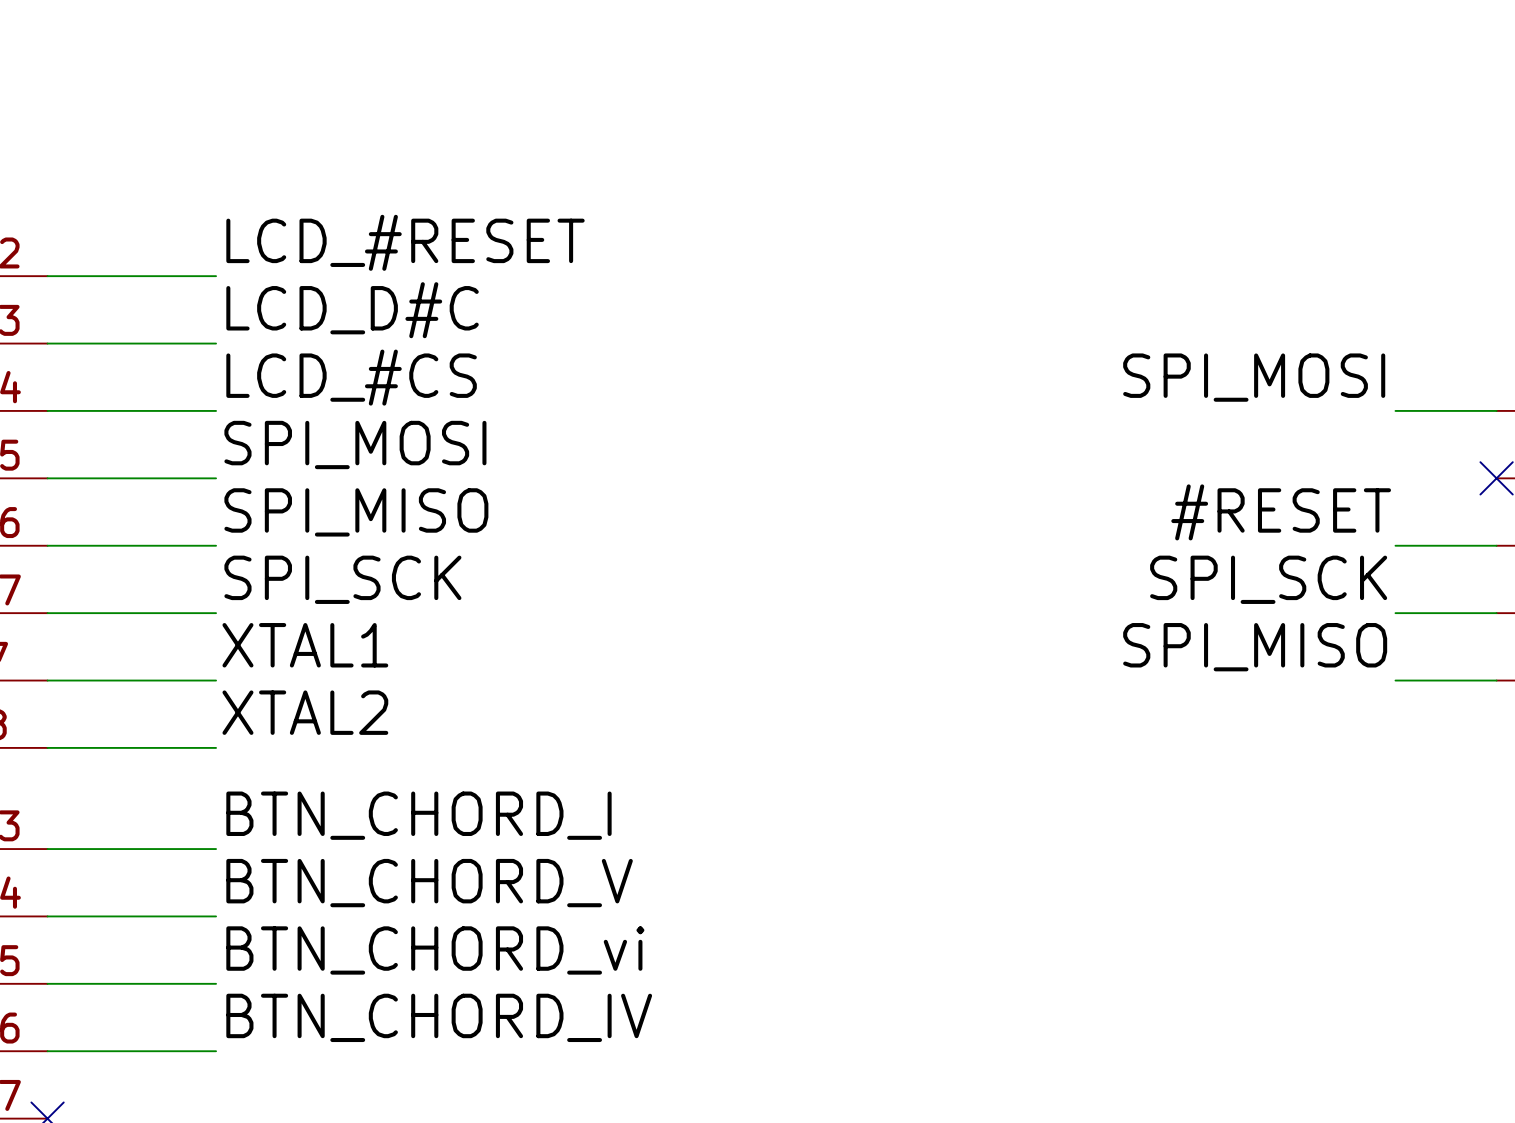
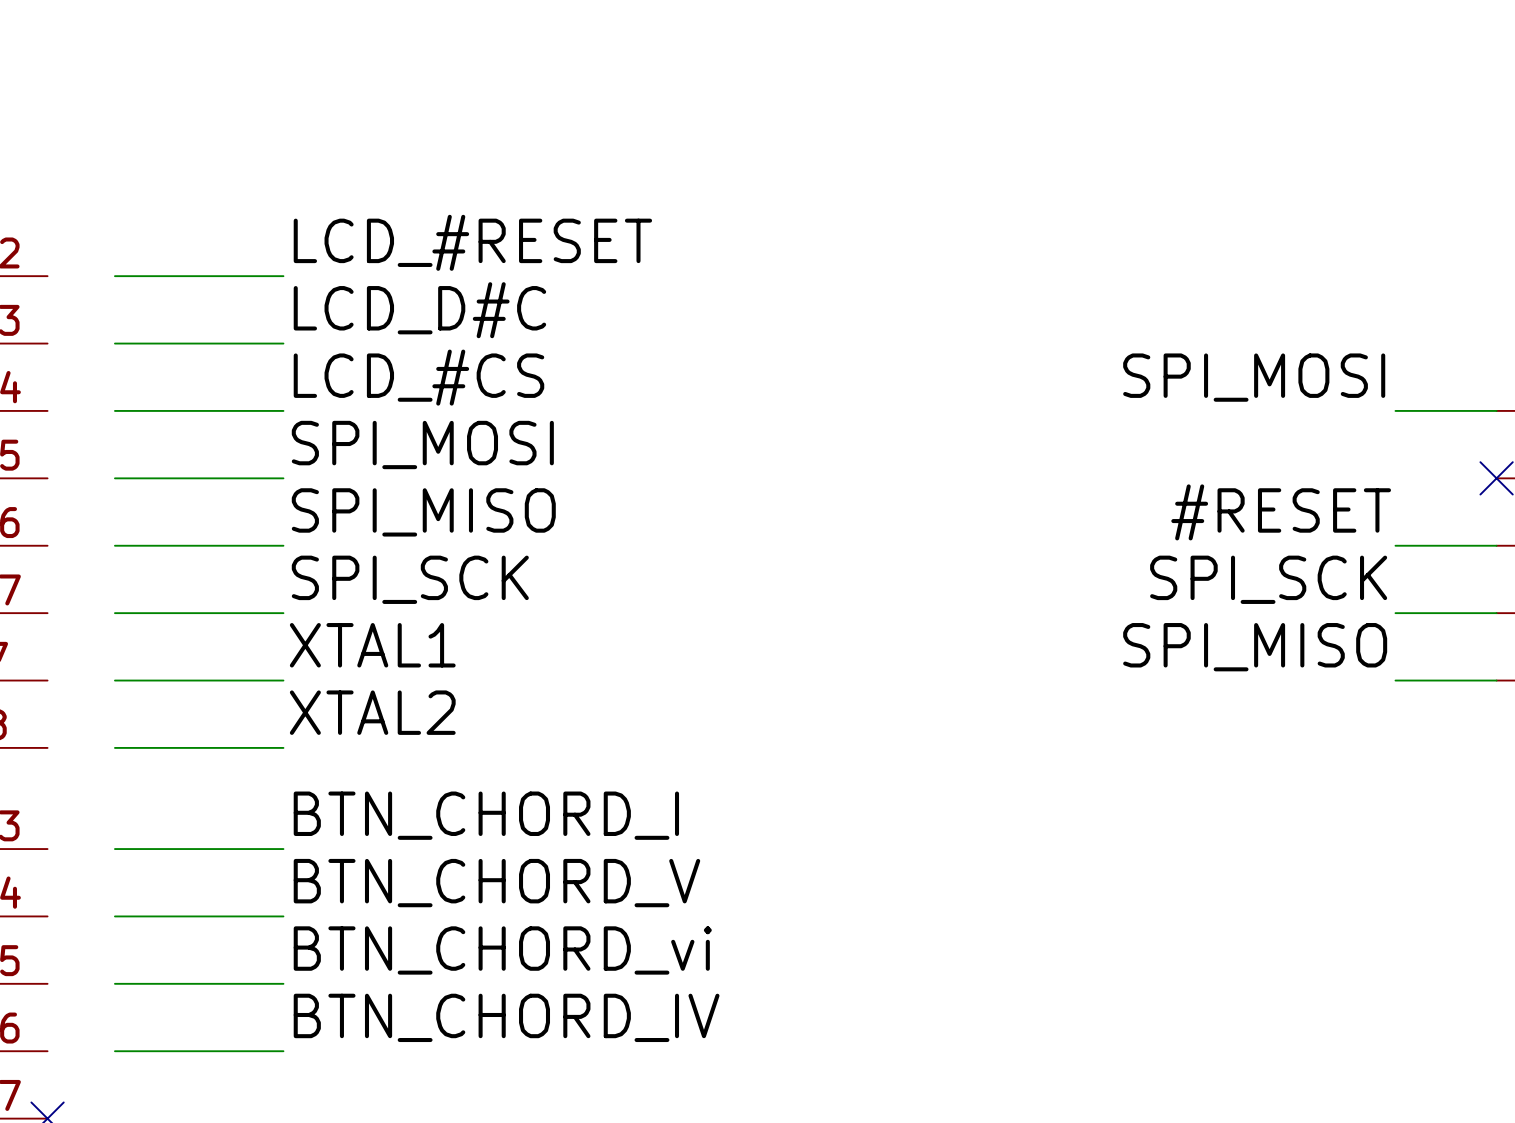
label position: LCD_#RESET (405, 242) -> LCD_#RESET (472, 242)
wire: (47, 276) (114, 276) -> (216, 276) (283, 276)
label position: LCD_D#C (352, 310) -> LCD_D#C (419, 310)
wire: (47, 343) (114, 343) -> (216, 343) (283, 343)
label position: LCD_#CS (351, 377) -> LCD_#CS (418, 377)
wire: (47, 410) (114, 410) -> (216, 410) (283, 410)
label position: SPI_MOSI (355, 444) -> SPI_MOSI (422, 444)
wire: (47, 478) (114, 478) -> (216, 478) (283, 478)
label position: SPI_MISO (356, 512) -> SPI_MISO (423, 512)
wire: (47, 545) (114, 545) -> (216, 545) (283, 545)
label position: SPI_SCK (342, 579) -> SPI_SCK (410, 579)
wire: (47, 613) (114, 613) -> (216, 613) (283, 613)
label position: XTAL1 (305, 645) -> XTAL1 (372, 645)
wire: (47, 680) (114, 680) -> (216, 680) (283, 680)
label position: XTAL2 (305, 712) -> XTAL2 (372, 712)
wire: (47, 747) (114, 747) -> (216, 747) (283, 747)
label position: BTN_CHORD_I (418, 815) -> BTN_CHORD_I (486, 815)
wire: (47, 849) (114, 849) -> (216, 849) (283, 849)
label position: BTN_CHORD_V (429, 883) -> BTN_CHORD_V (496, 883)
wire: (47, 916) (114, 916) -> (216, 916) (283, 916)
label position: BTN_CHORD_vi (435, 950) -> BTN_CHORD_vi (502, 950)
wire: (47, 983) (114, 983) -> (216, 983) (283, 983)
label position: BTN_CHORD_IV (439, 1017) -> BTN_CHORD_IV (506, 1017)
wire: (47, 1051) (114, 1051) -> (216, 1051) (283, 1051)

